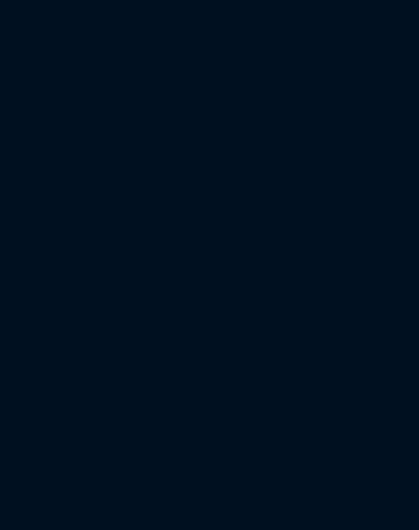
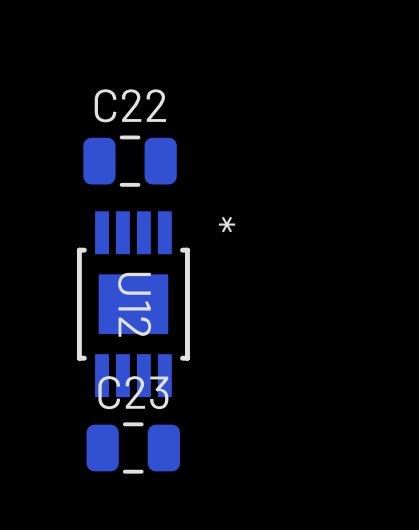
C22: none -> (130, 161)
U12: none -> (133, 304)
C23: none -> (133, 448)

